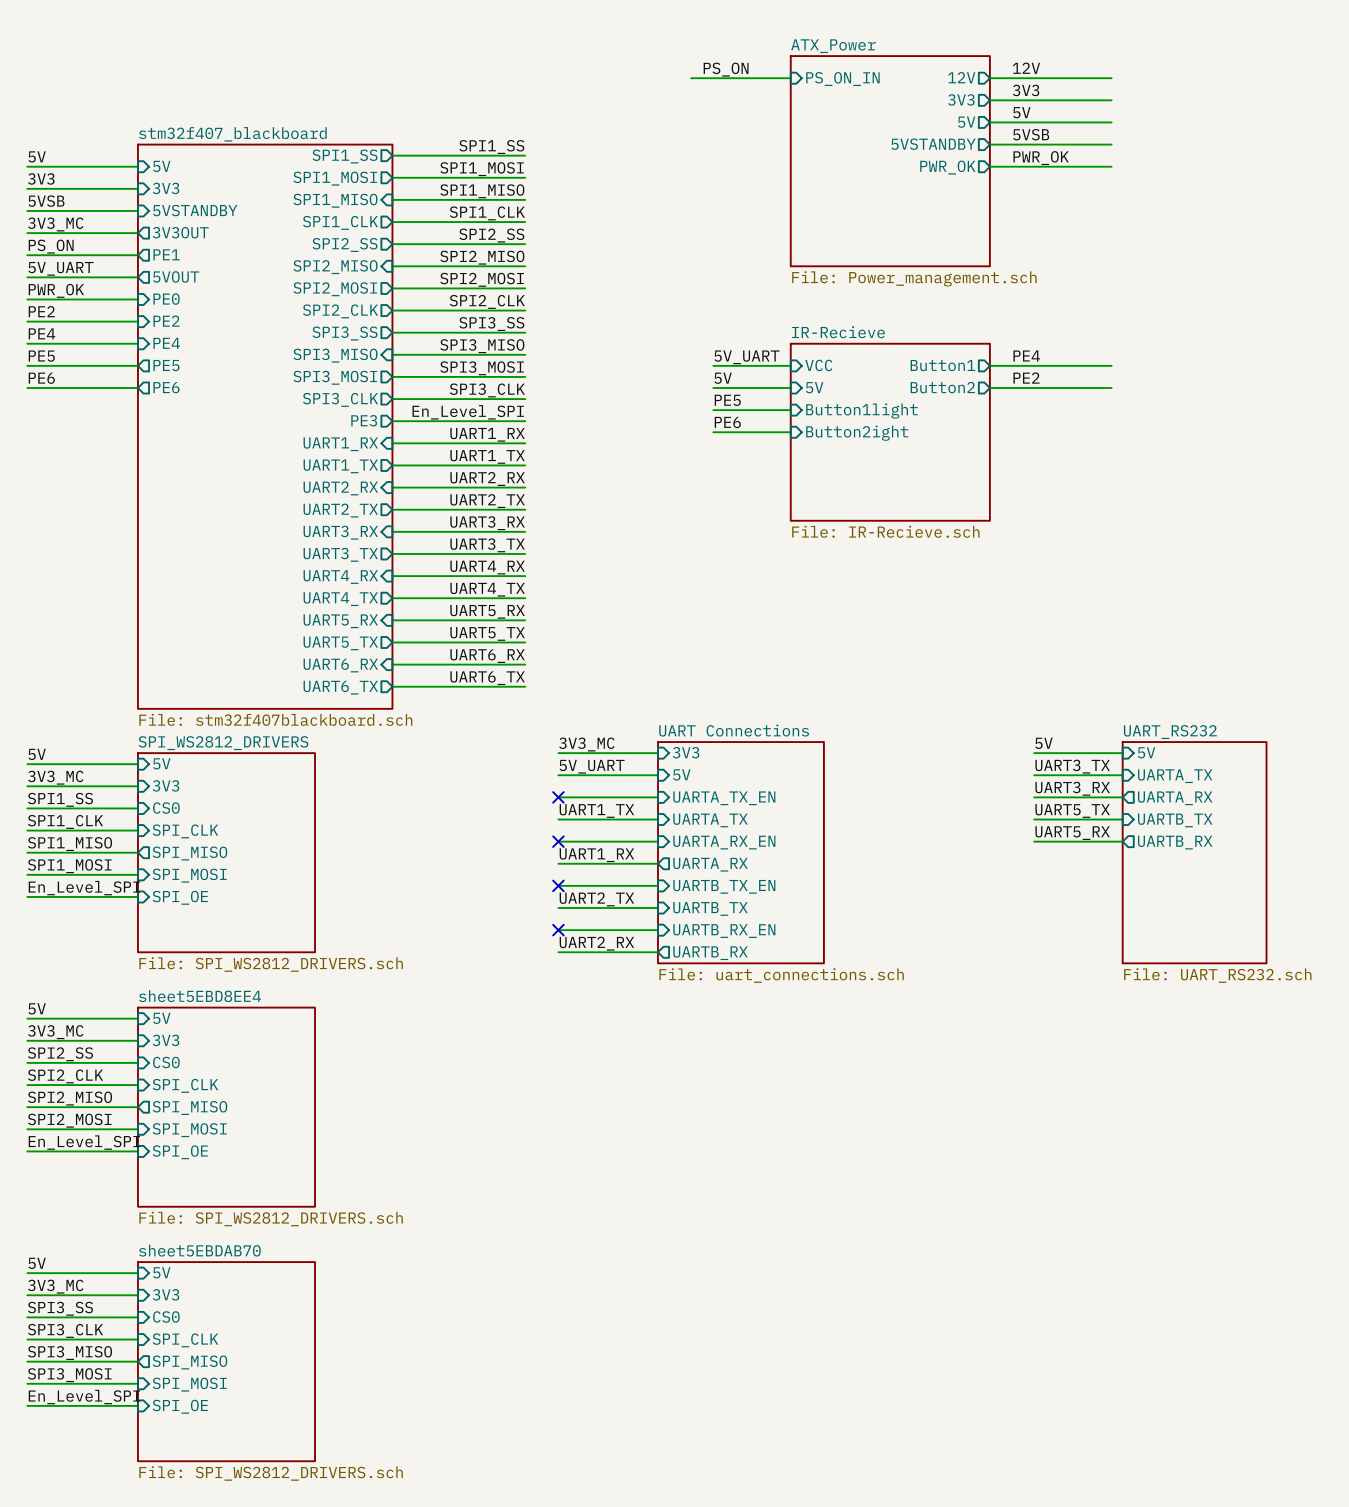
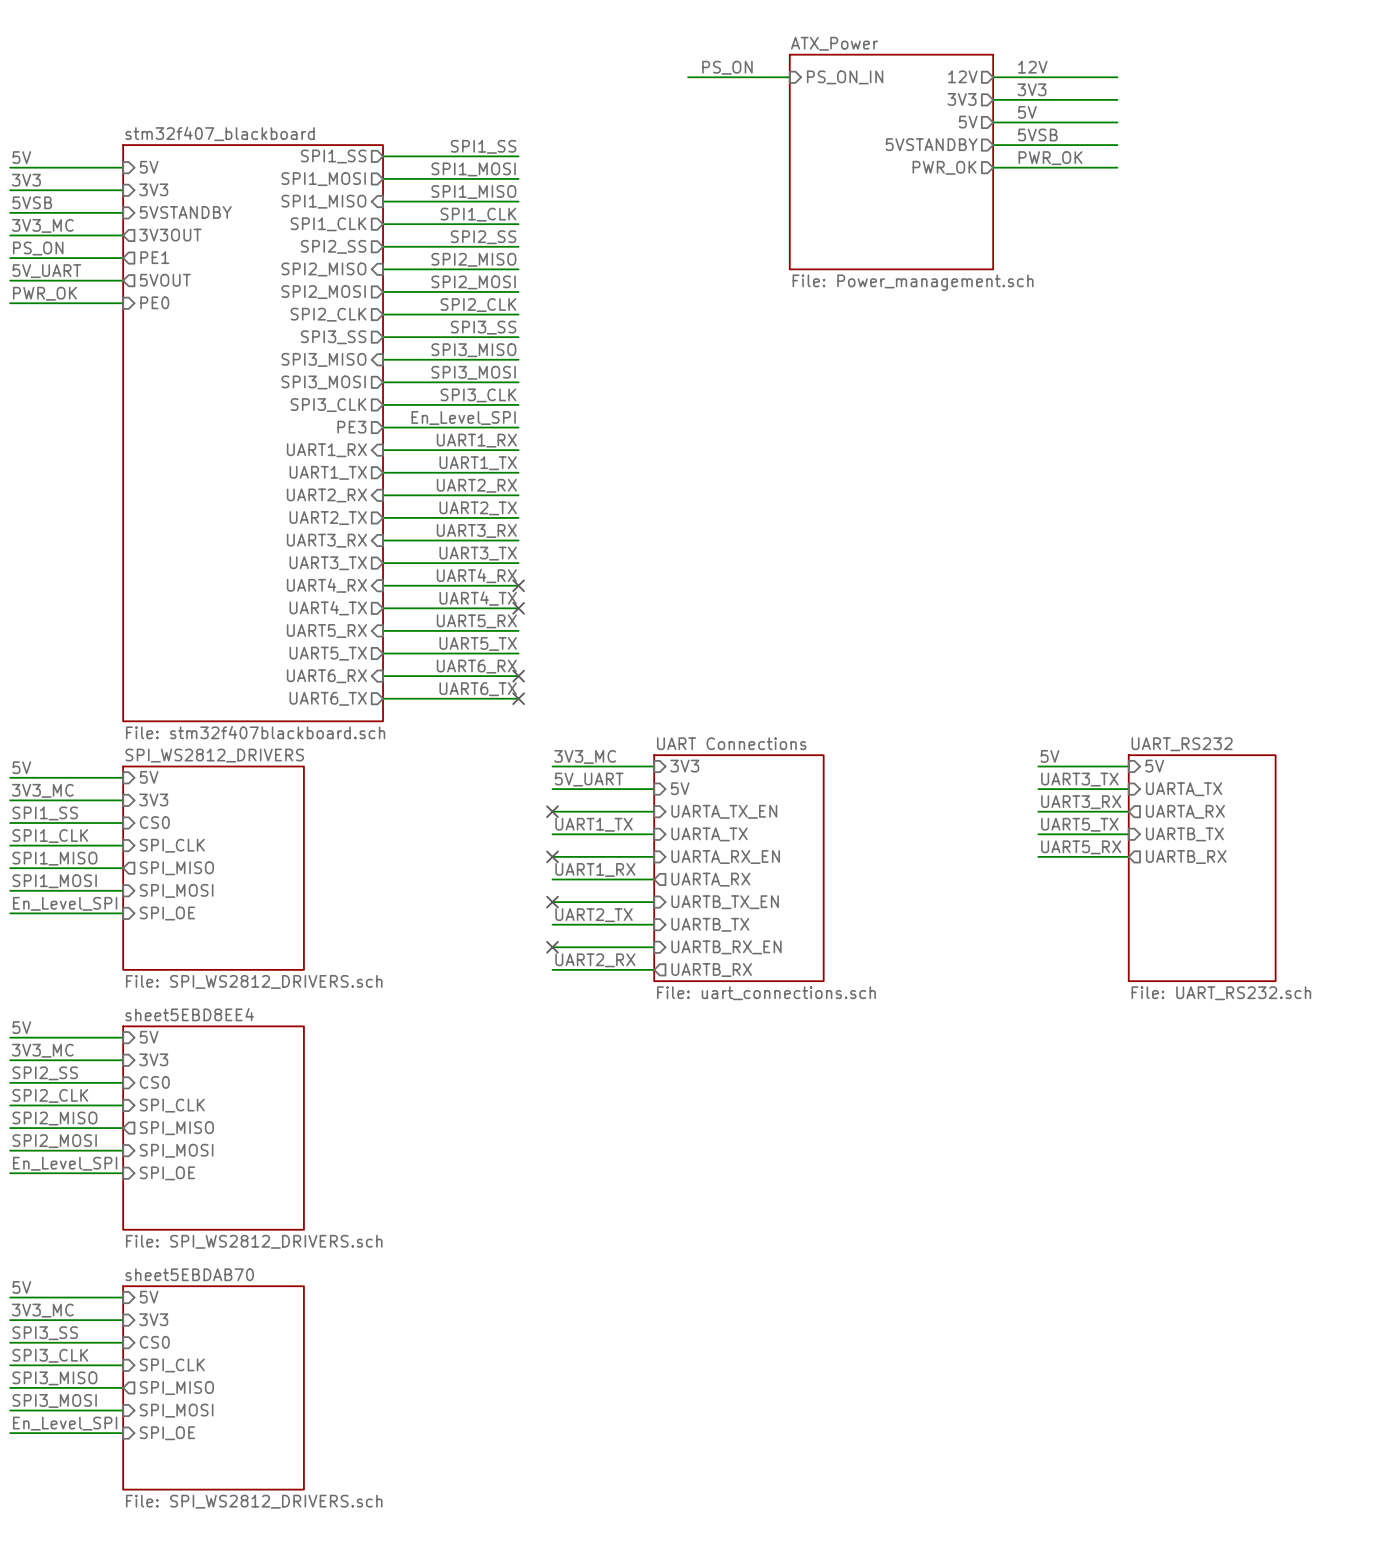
label: PE2 (41, 311) -> none
wire: (27, 321) (137, 321) -> none
sheet pin: PE2 (166, 321) -> none
label: PE4 (42, 333) -> none
wire: (27, 343) (137, 343) -> none
sheet pin: PE4 (166, 343) -> none
label: PE5 (41, 356) -> none
label: PE4 (1026, 356) -> none
label: 5V_UART (746, 357) -> none
wire: (27, 365) (137, 365) -> none
sheet pin: PE5 (166, 365) -> none
wire: (713, 365) (790, 365) -> none
sheet pin: VCC (818, 365) -> none
sheet pin: Button1 (942, 365) -> none
wire: (989, 365) (1111, 365) -> none
label: PE6 (41, 378) -> none
label: 5V (723, 378) -> none
label: PE2 (1026, 378) -> none
sheet pin: PE6 (166, 387) -> none
sheet pin: 5V (814, 387) -> none
sheet pin: Button2 (942, 387) -> none
wire: (27, 388) (137, 388) -> none
wire: (713, 388) (790, 388) -> none
wire: (989, 388) (1111, 388) -> none
label: PE5 (727, 400) -> none
wire: (713, 410) (790, 410) -> none
sheet pin: Button1light (861, 411) -> none
label: PE6 (727, 422) -> none
wire: (713, 432) (790, 432) -> none
sheet IR-Recieve: File: IR-Recieve.sch (890, 432) -> none
sheet pin: Button2ight (857, 433) -> none
no-connect mark: none -> (518, 585)
no-connect mark: none -> (518, 608)
no-connect mark: none -> (518, 676)
no-connect mark: none -> (518, 698)

